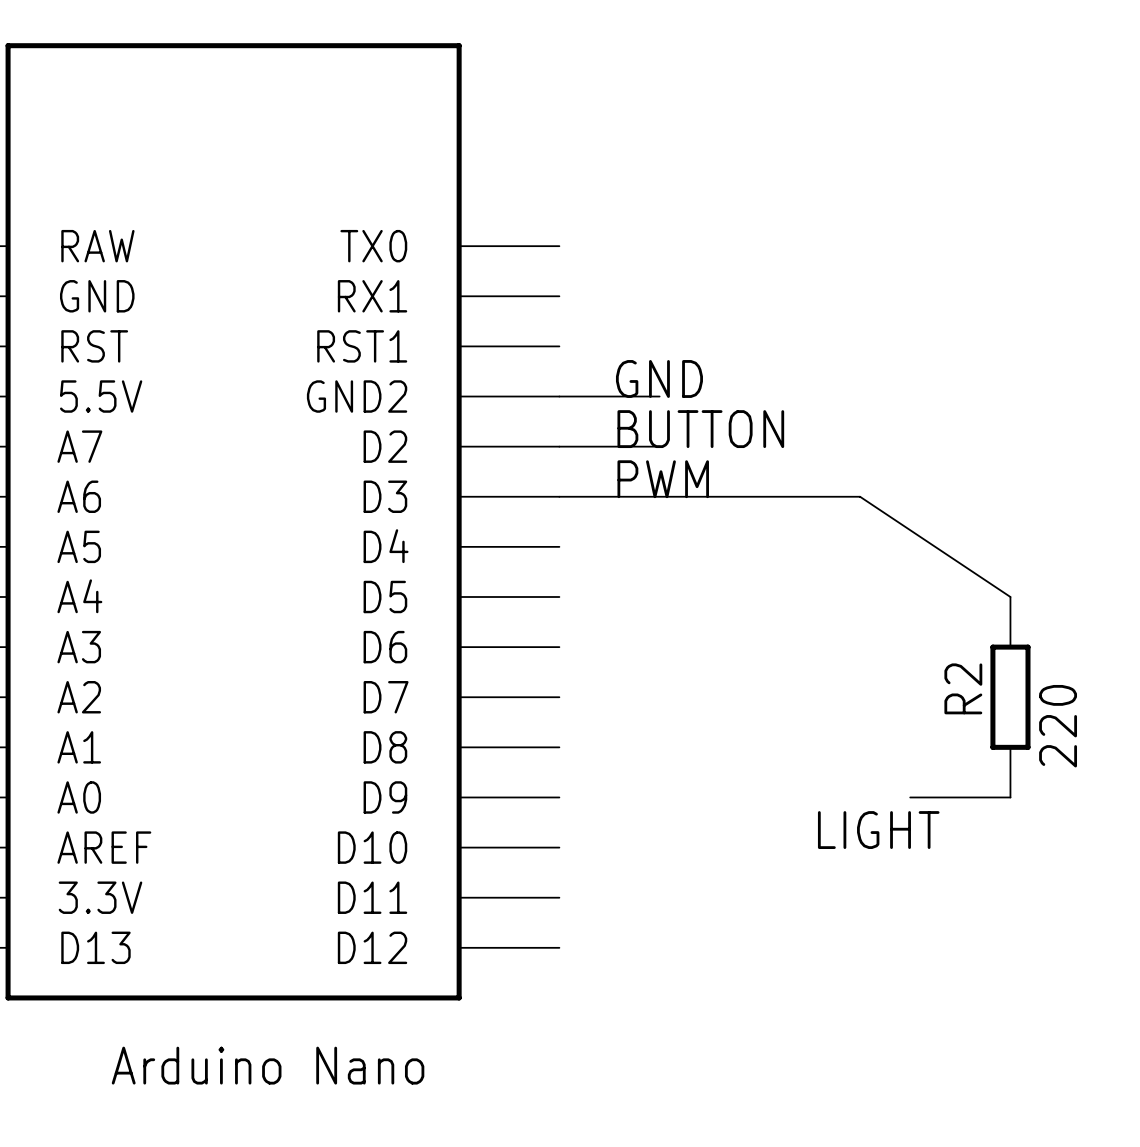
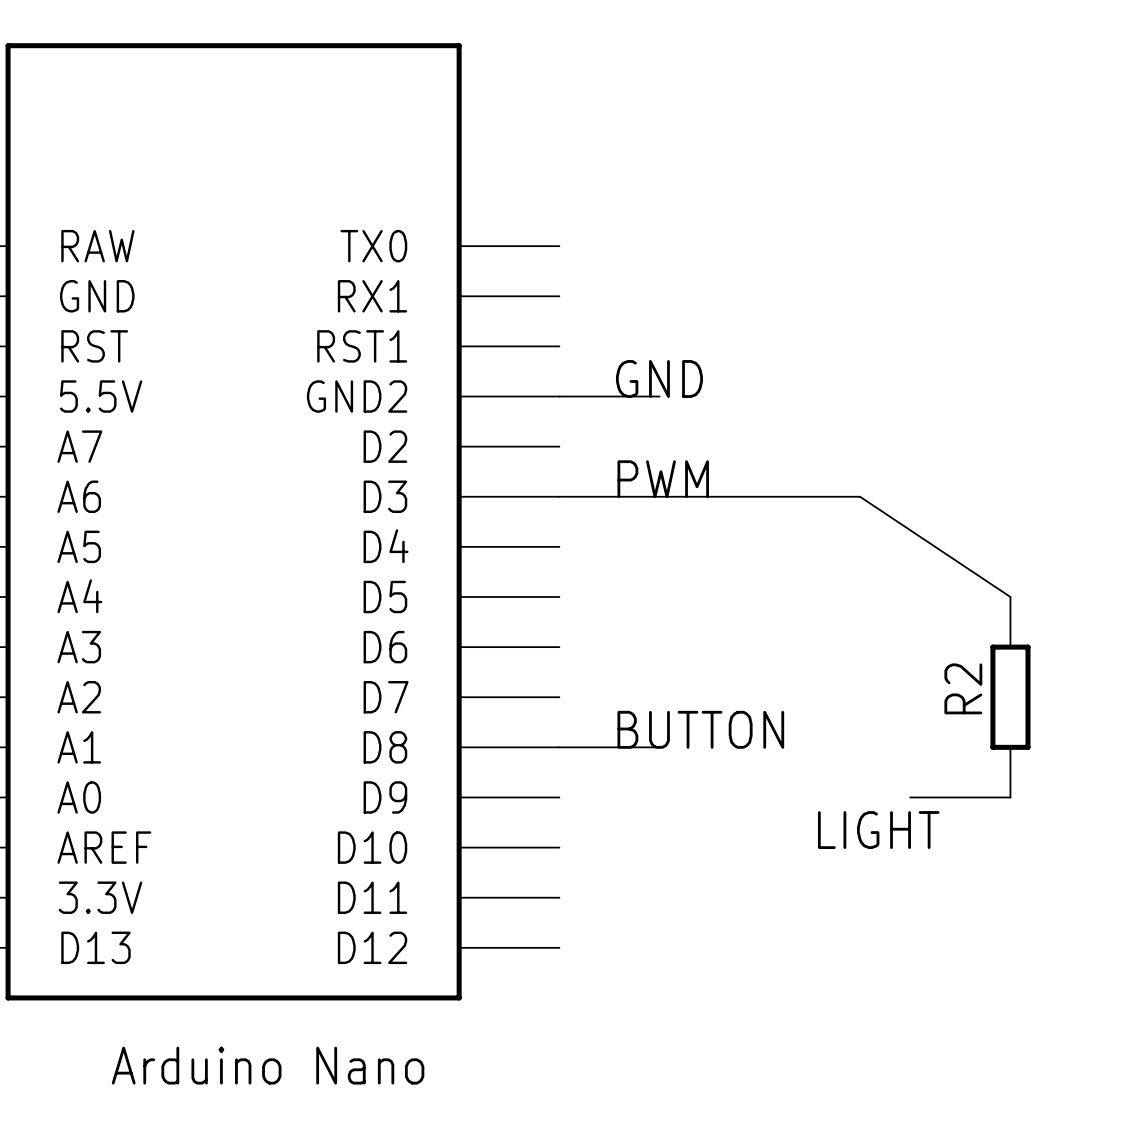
label position: BUTTON (700, 429) -> BUTTON (700, 729)
wire: (559, 446) (659, 446) -> (559, 747) (659, 747)
R2 value: 220 (1058, 726) -> none

